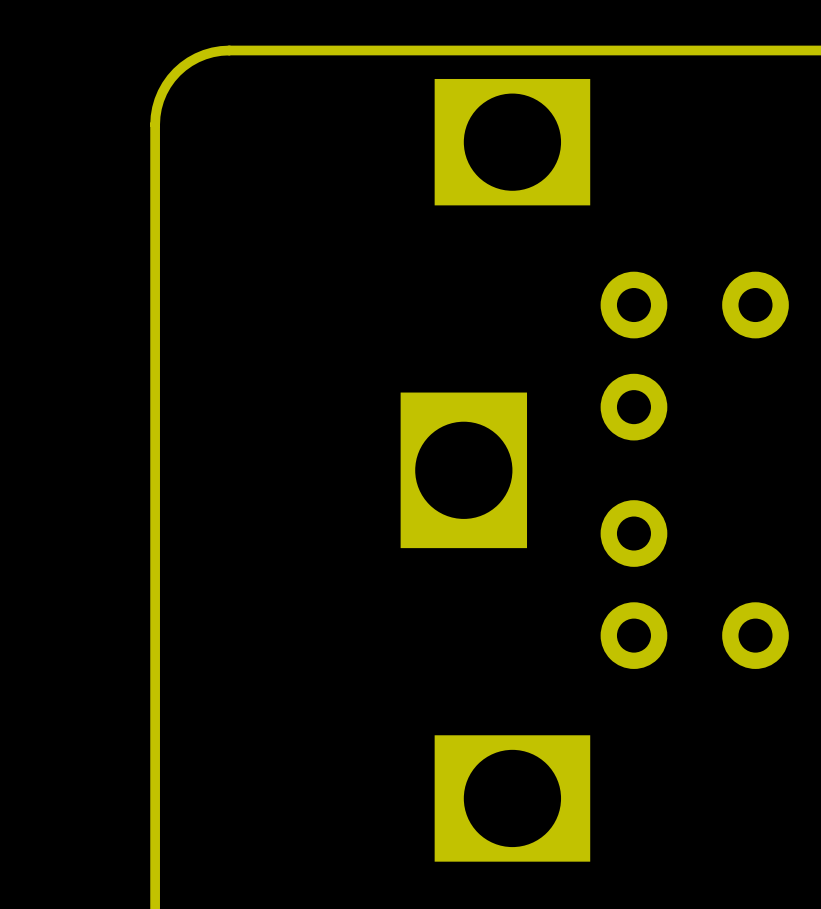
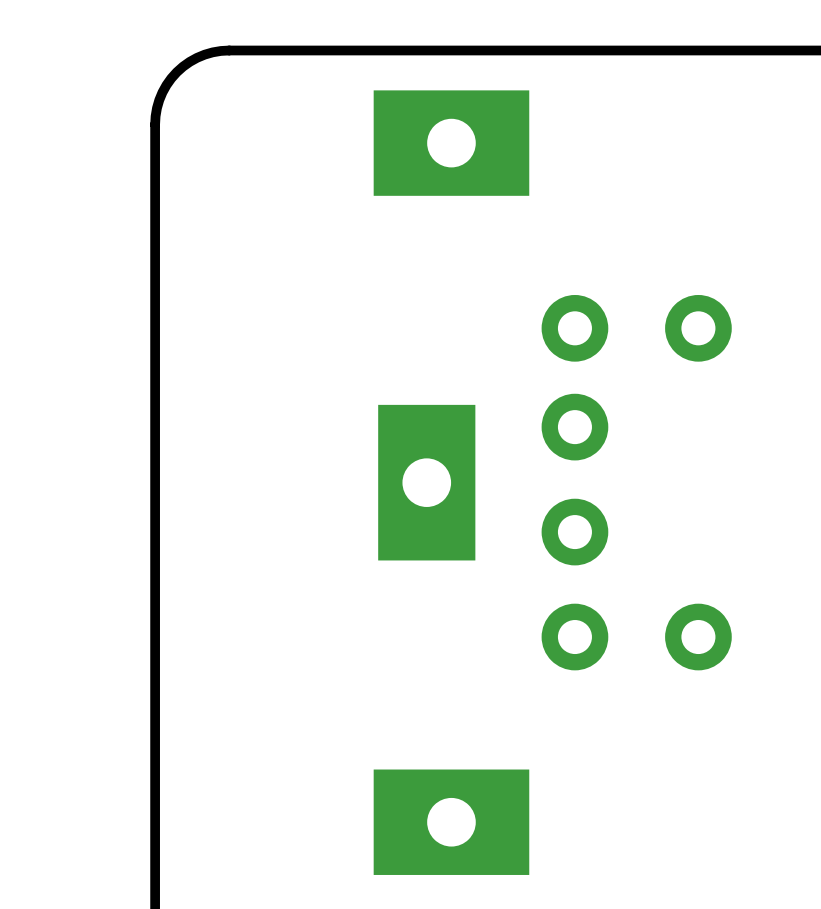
part footprint: [400, 78, 789, 862] -> [373, 90, 732, 875]

